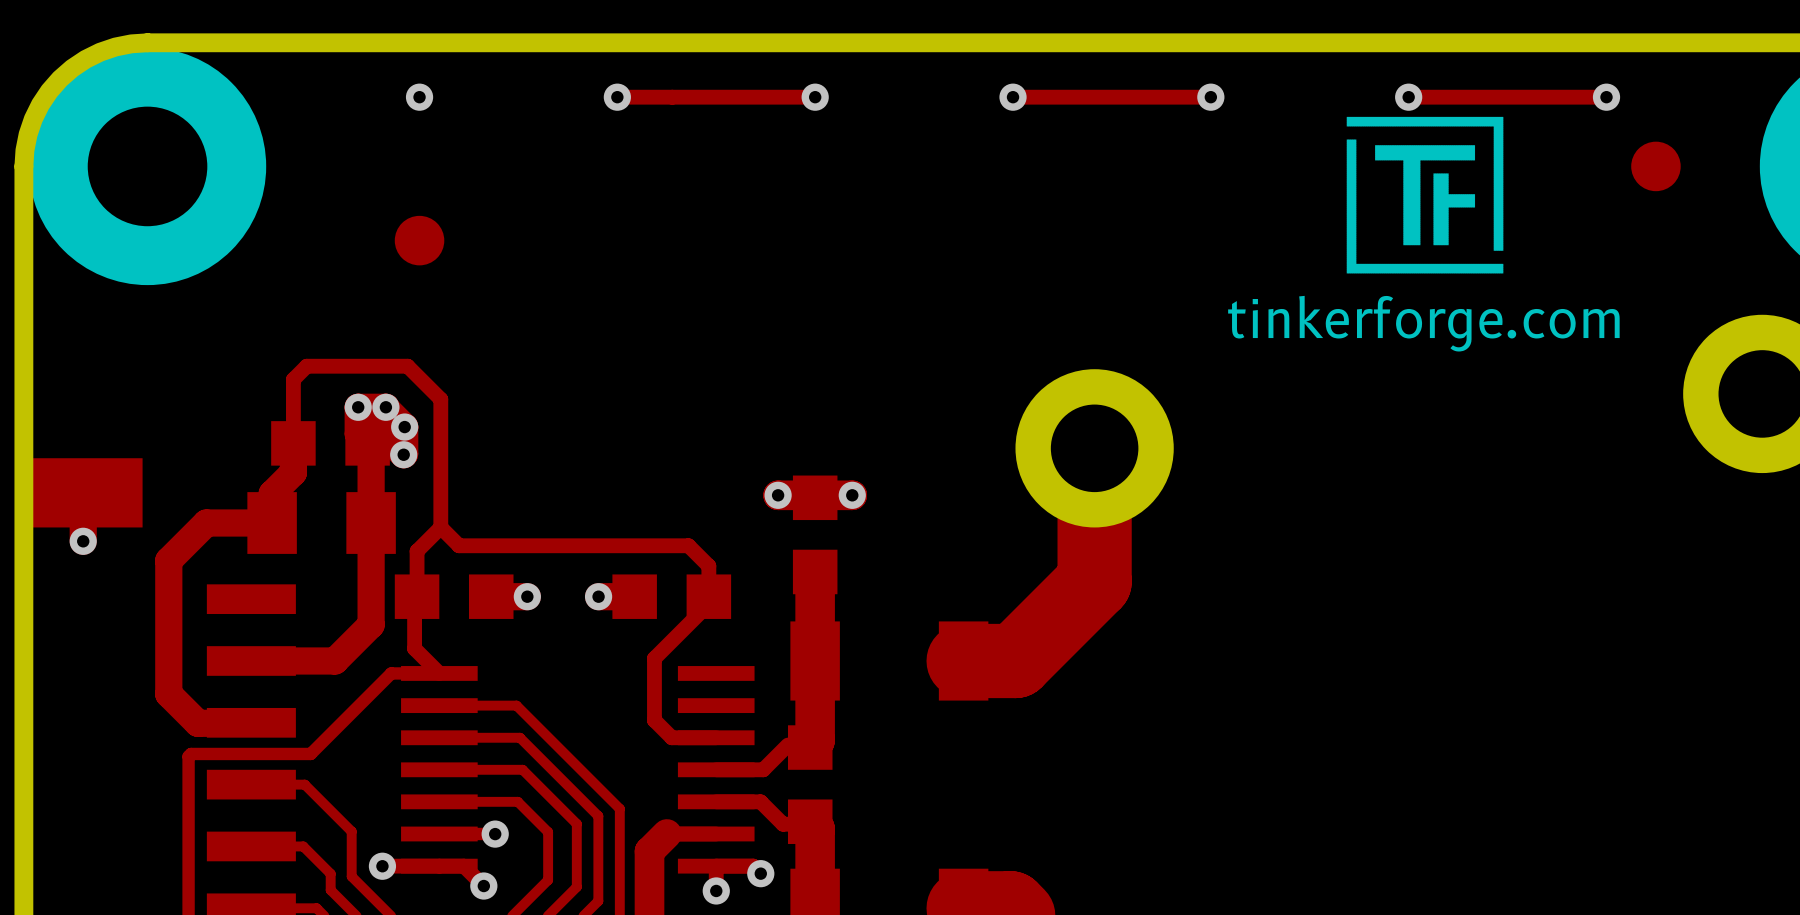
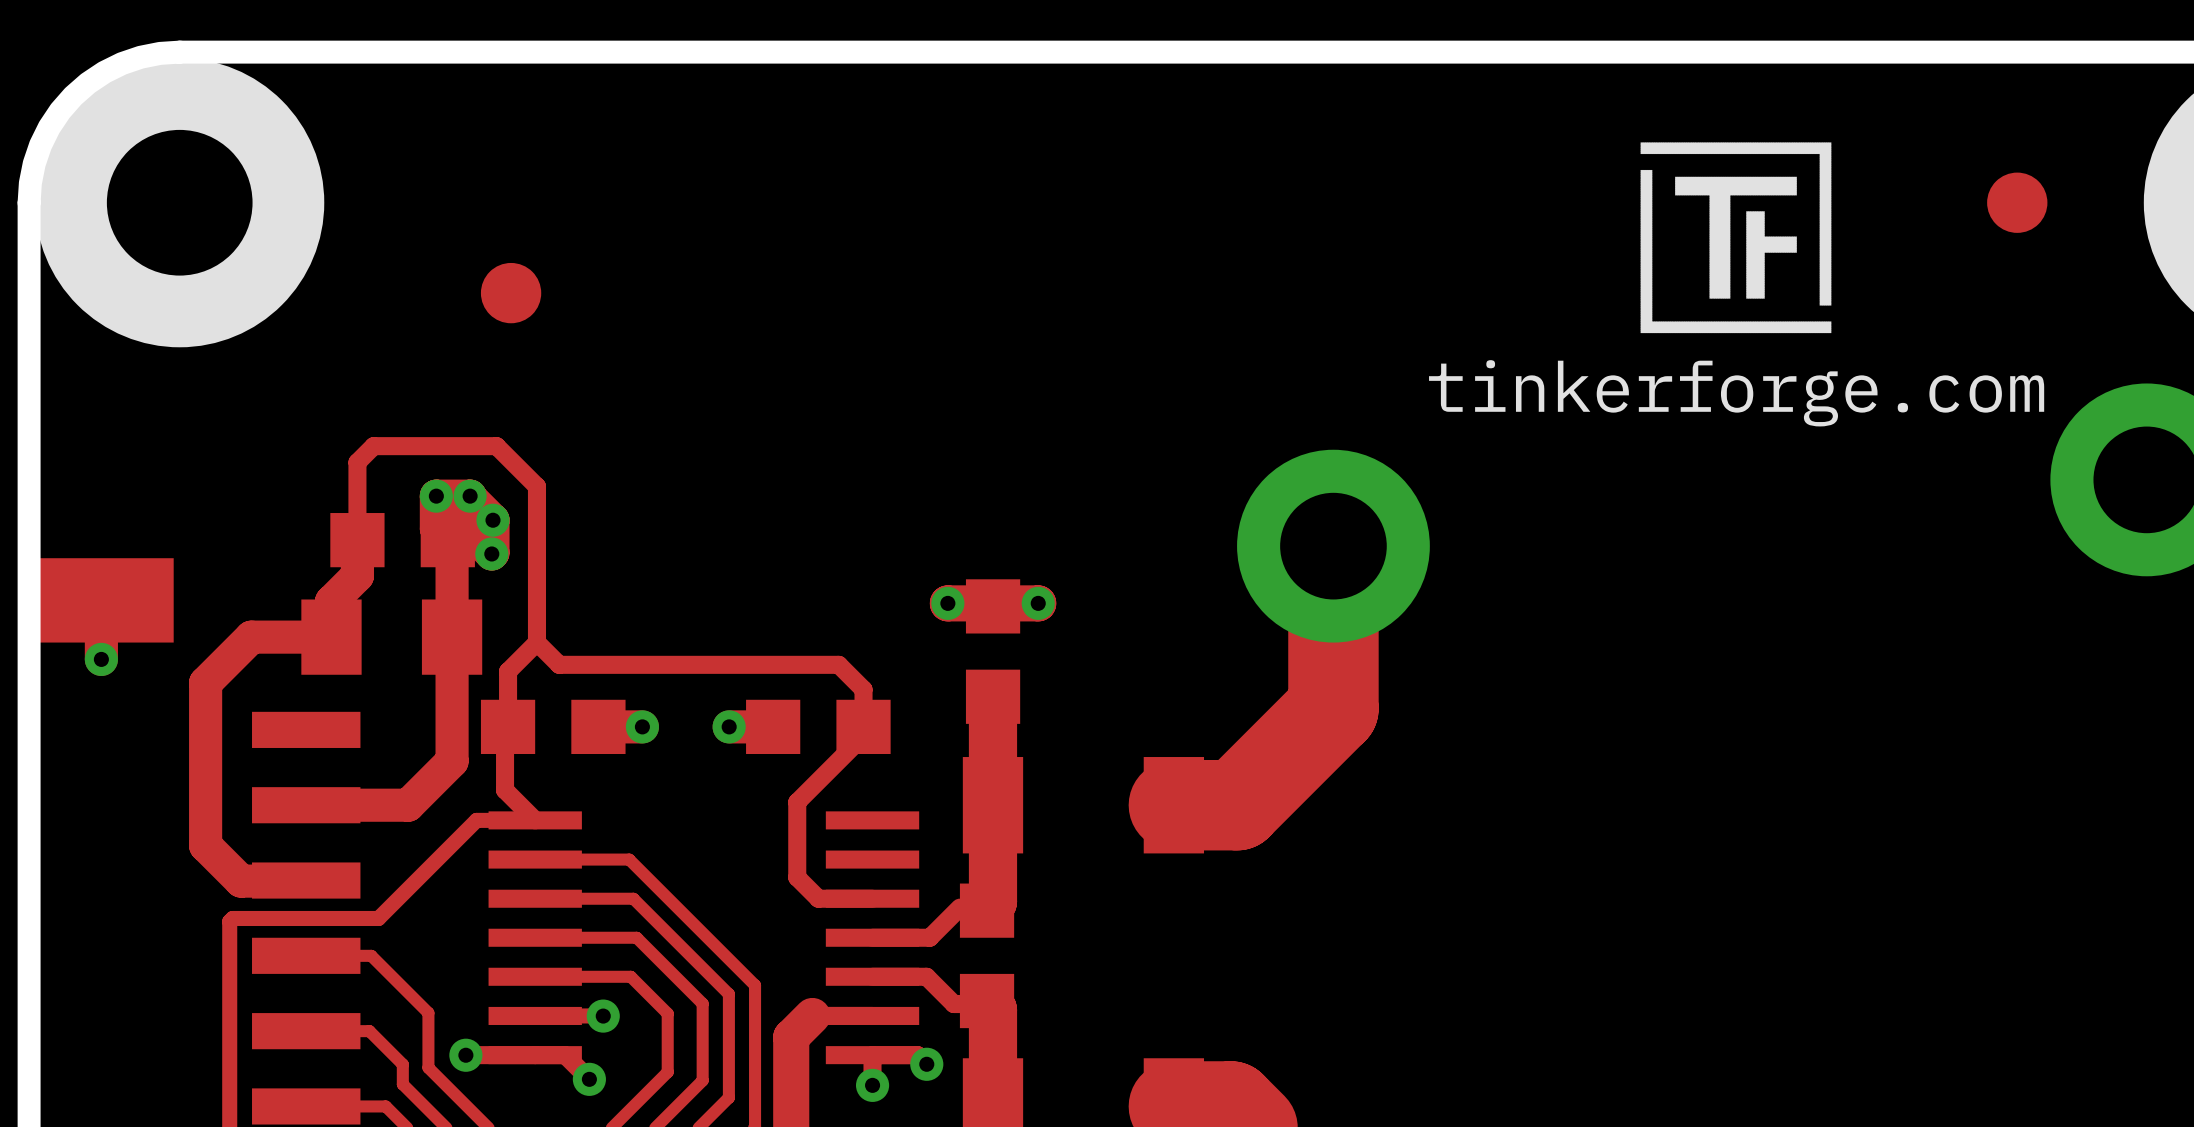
via: (419, 97) -> none
track: (617, 97) (815, 97) -> none
via: (617, 97) -> none
via: (815, 97) -> none
track: (1013, 97) (1210, 97) -> none
via: (1013, 97) -> none
via: (1210, 97) -> none
track: (1408, 97) (1606, 97) -> none
via: (1408, 97) -> none
via: (1606, 97) -> none

